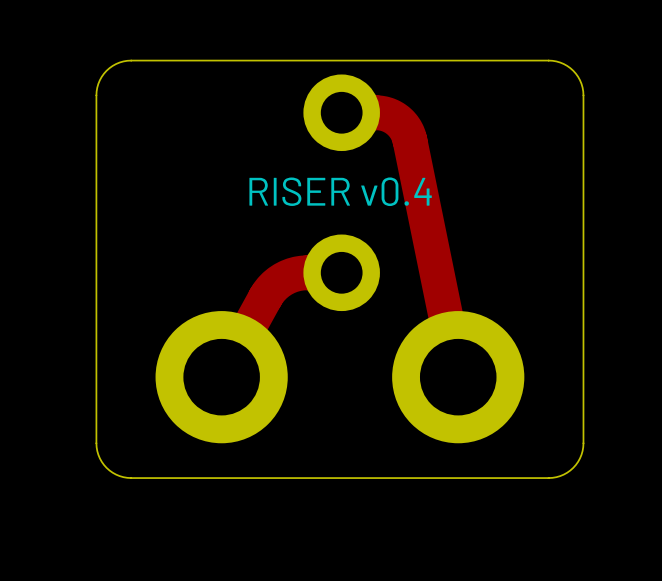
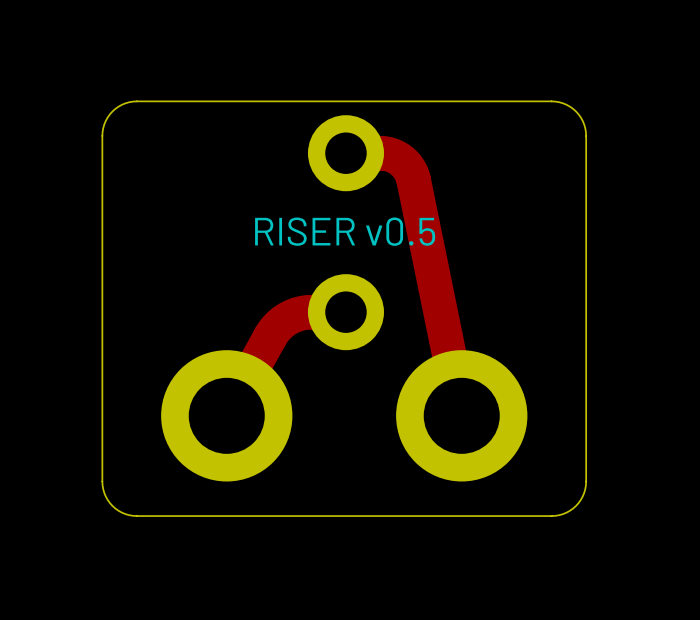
text: RISER v0.4 (340, 191) -> RISER v0.5 (345, 231)

